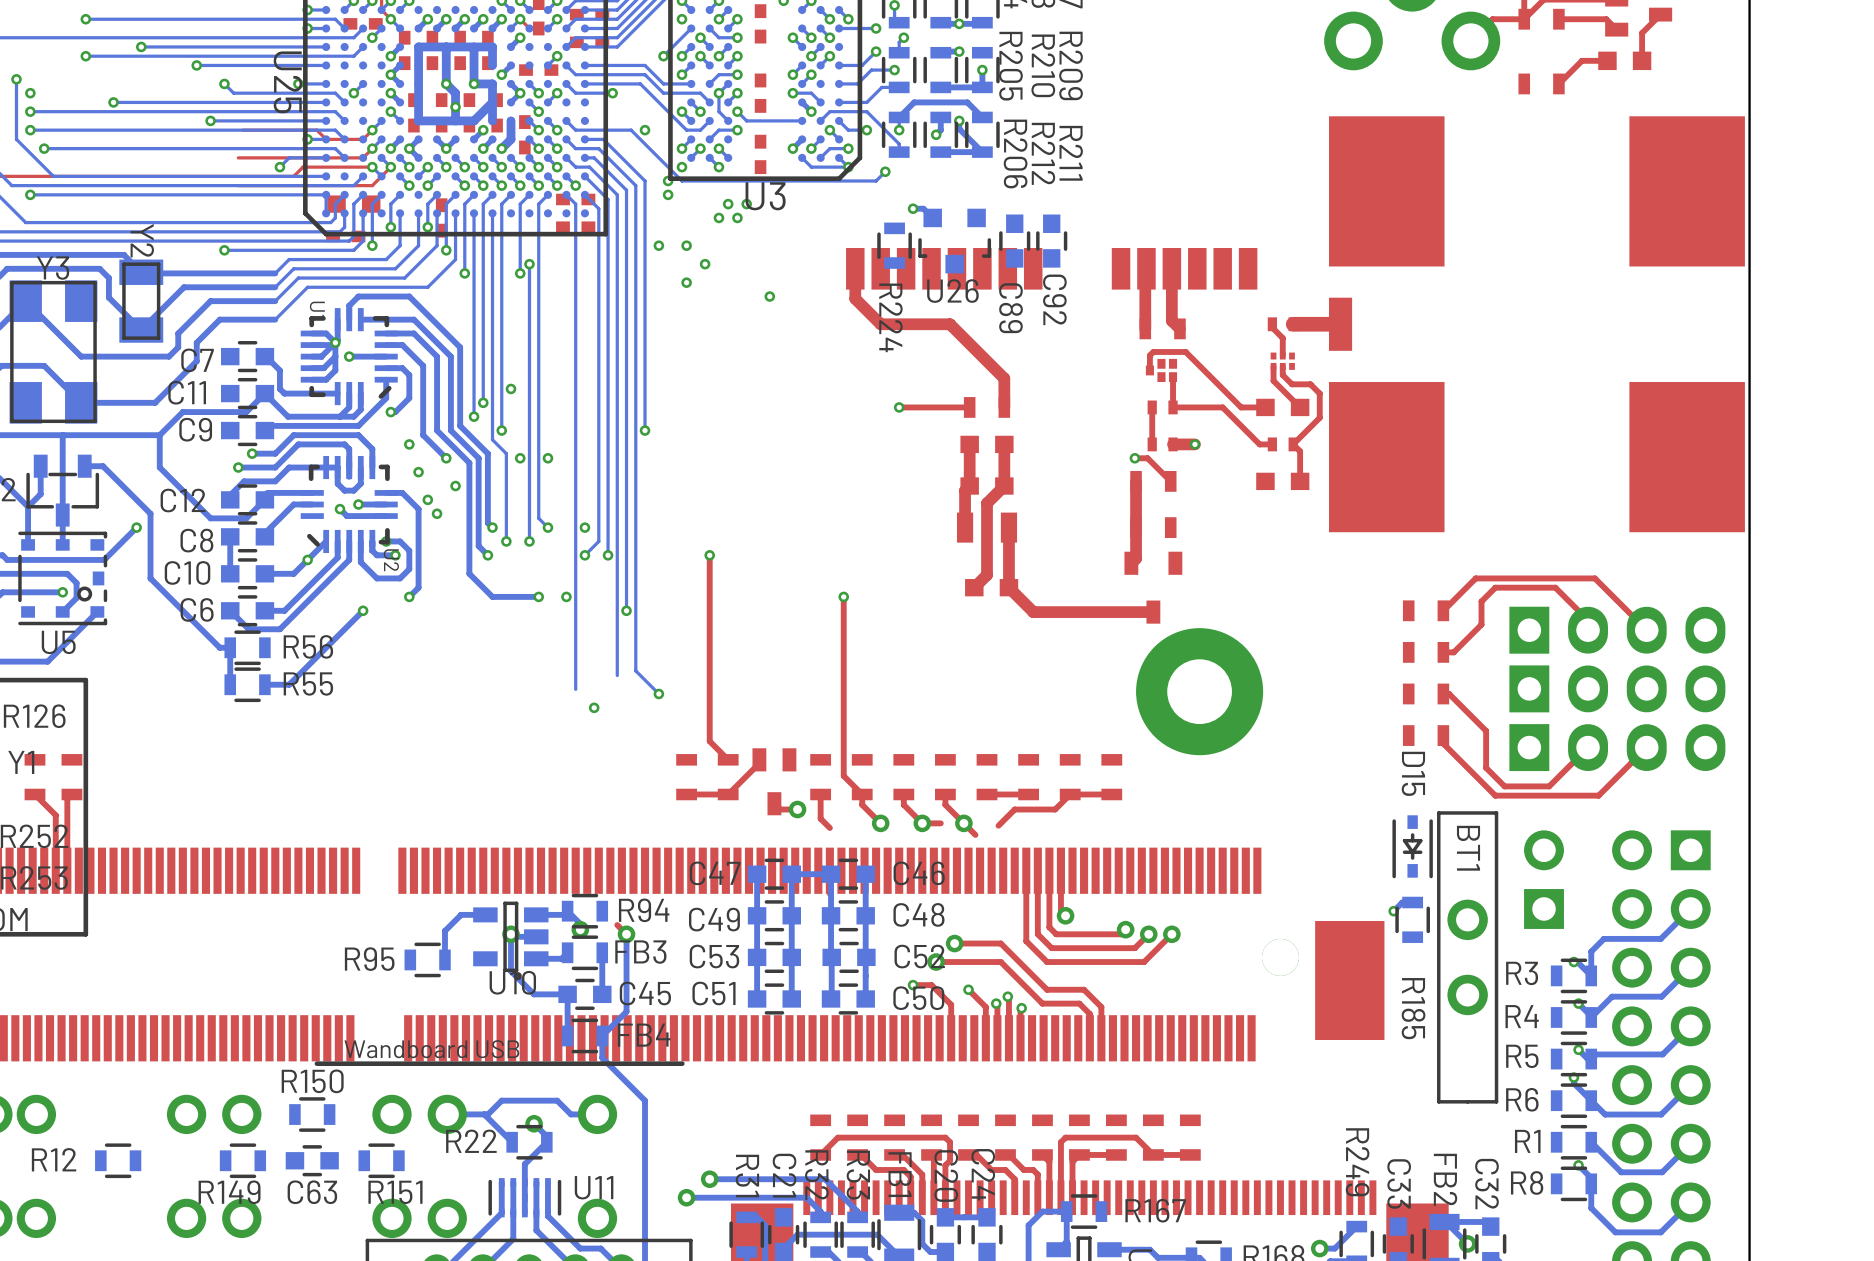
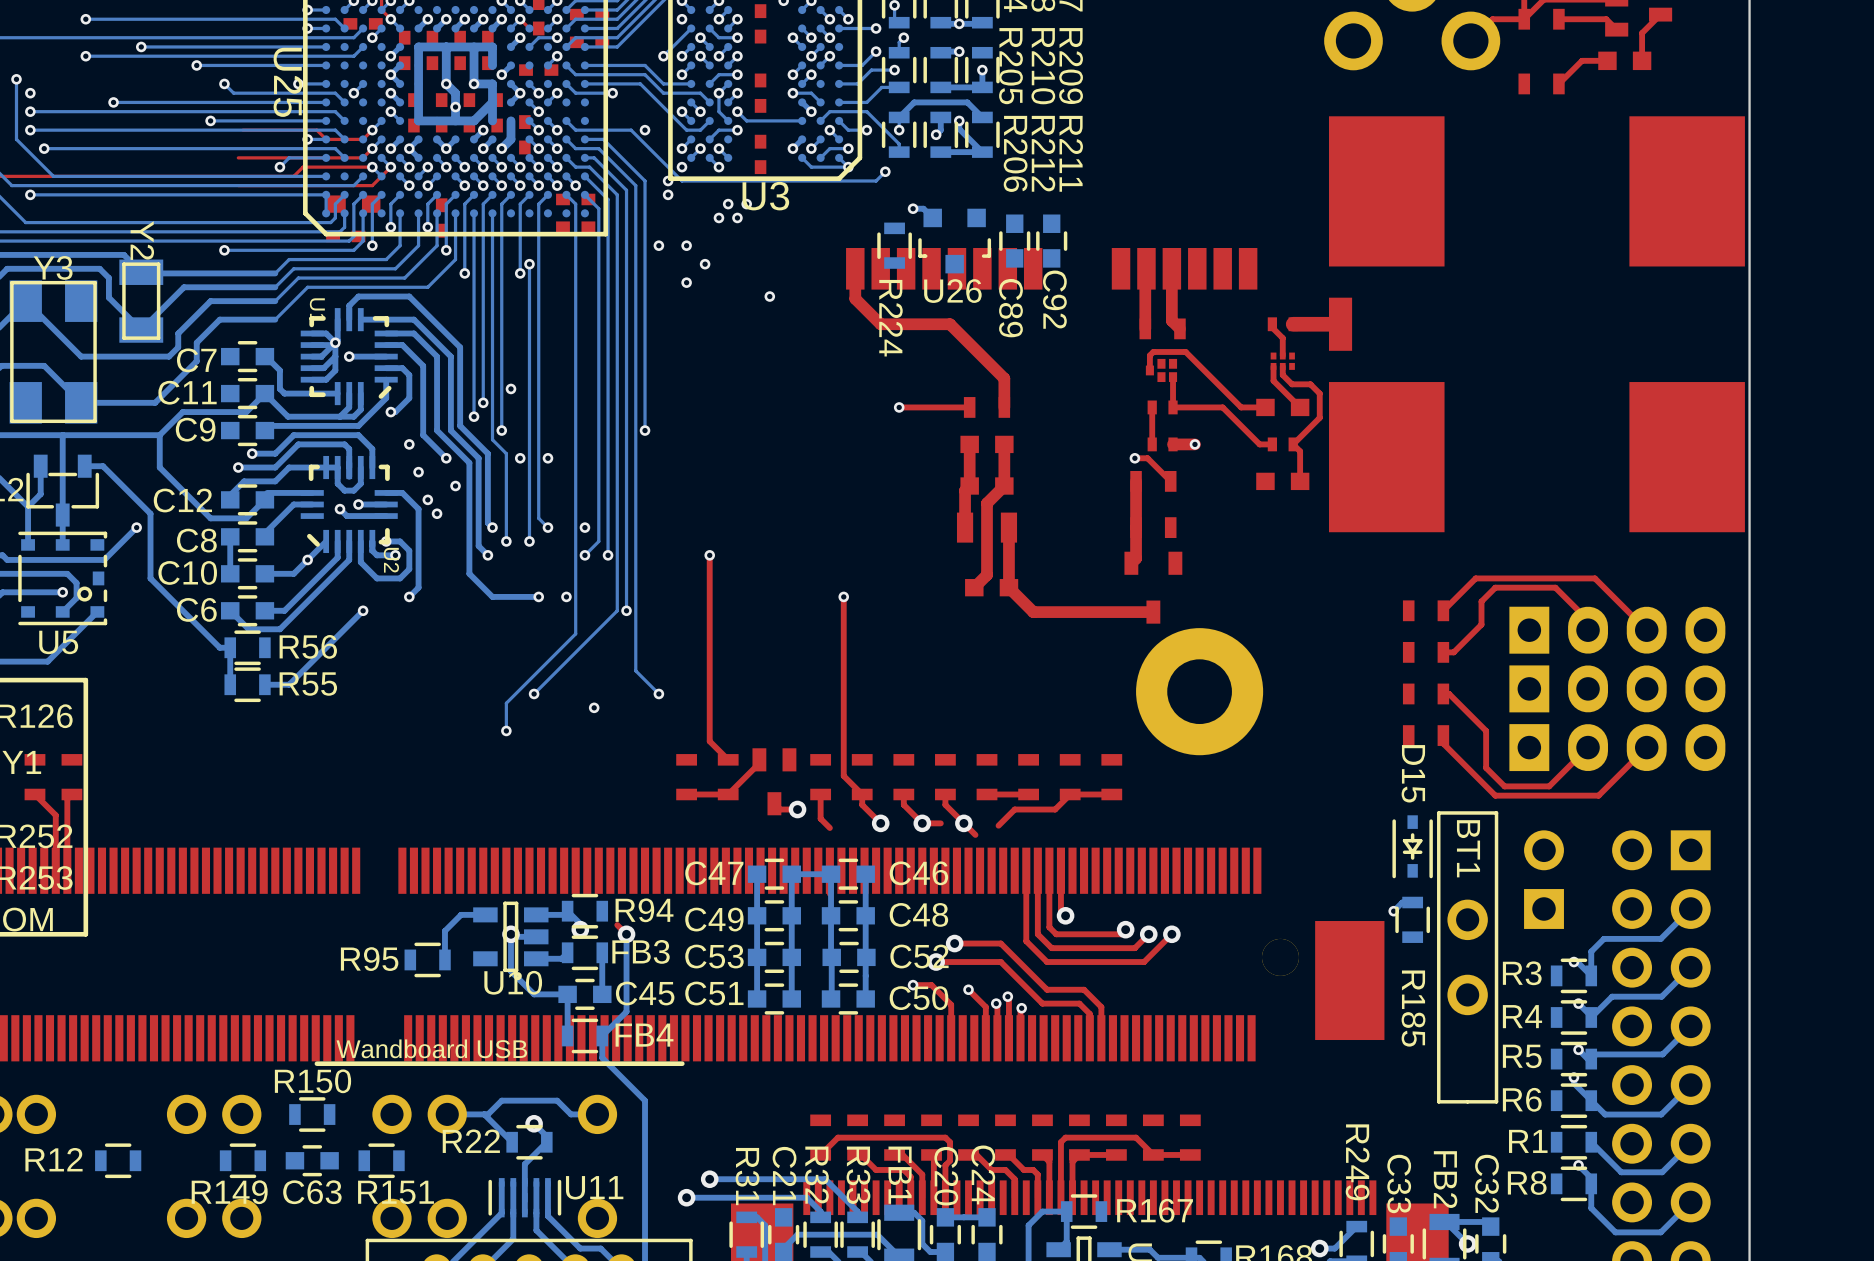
bottom track: none -> (557, 37) (538, 37) (529, 46)
via: none -> (557, 37)
bottom track: (617, 610) (617, 675) -> (617, 610) (534, 693)
bottom track: (575, 633) (575, 689) -> (575, 633) (506, 703) (506, 730)
via: none -> (534, 693)
via: none -> (506, 730)

